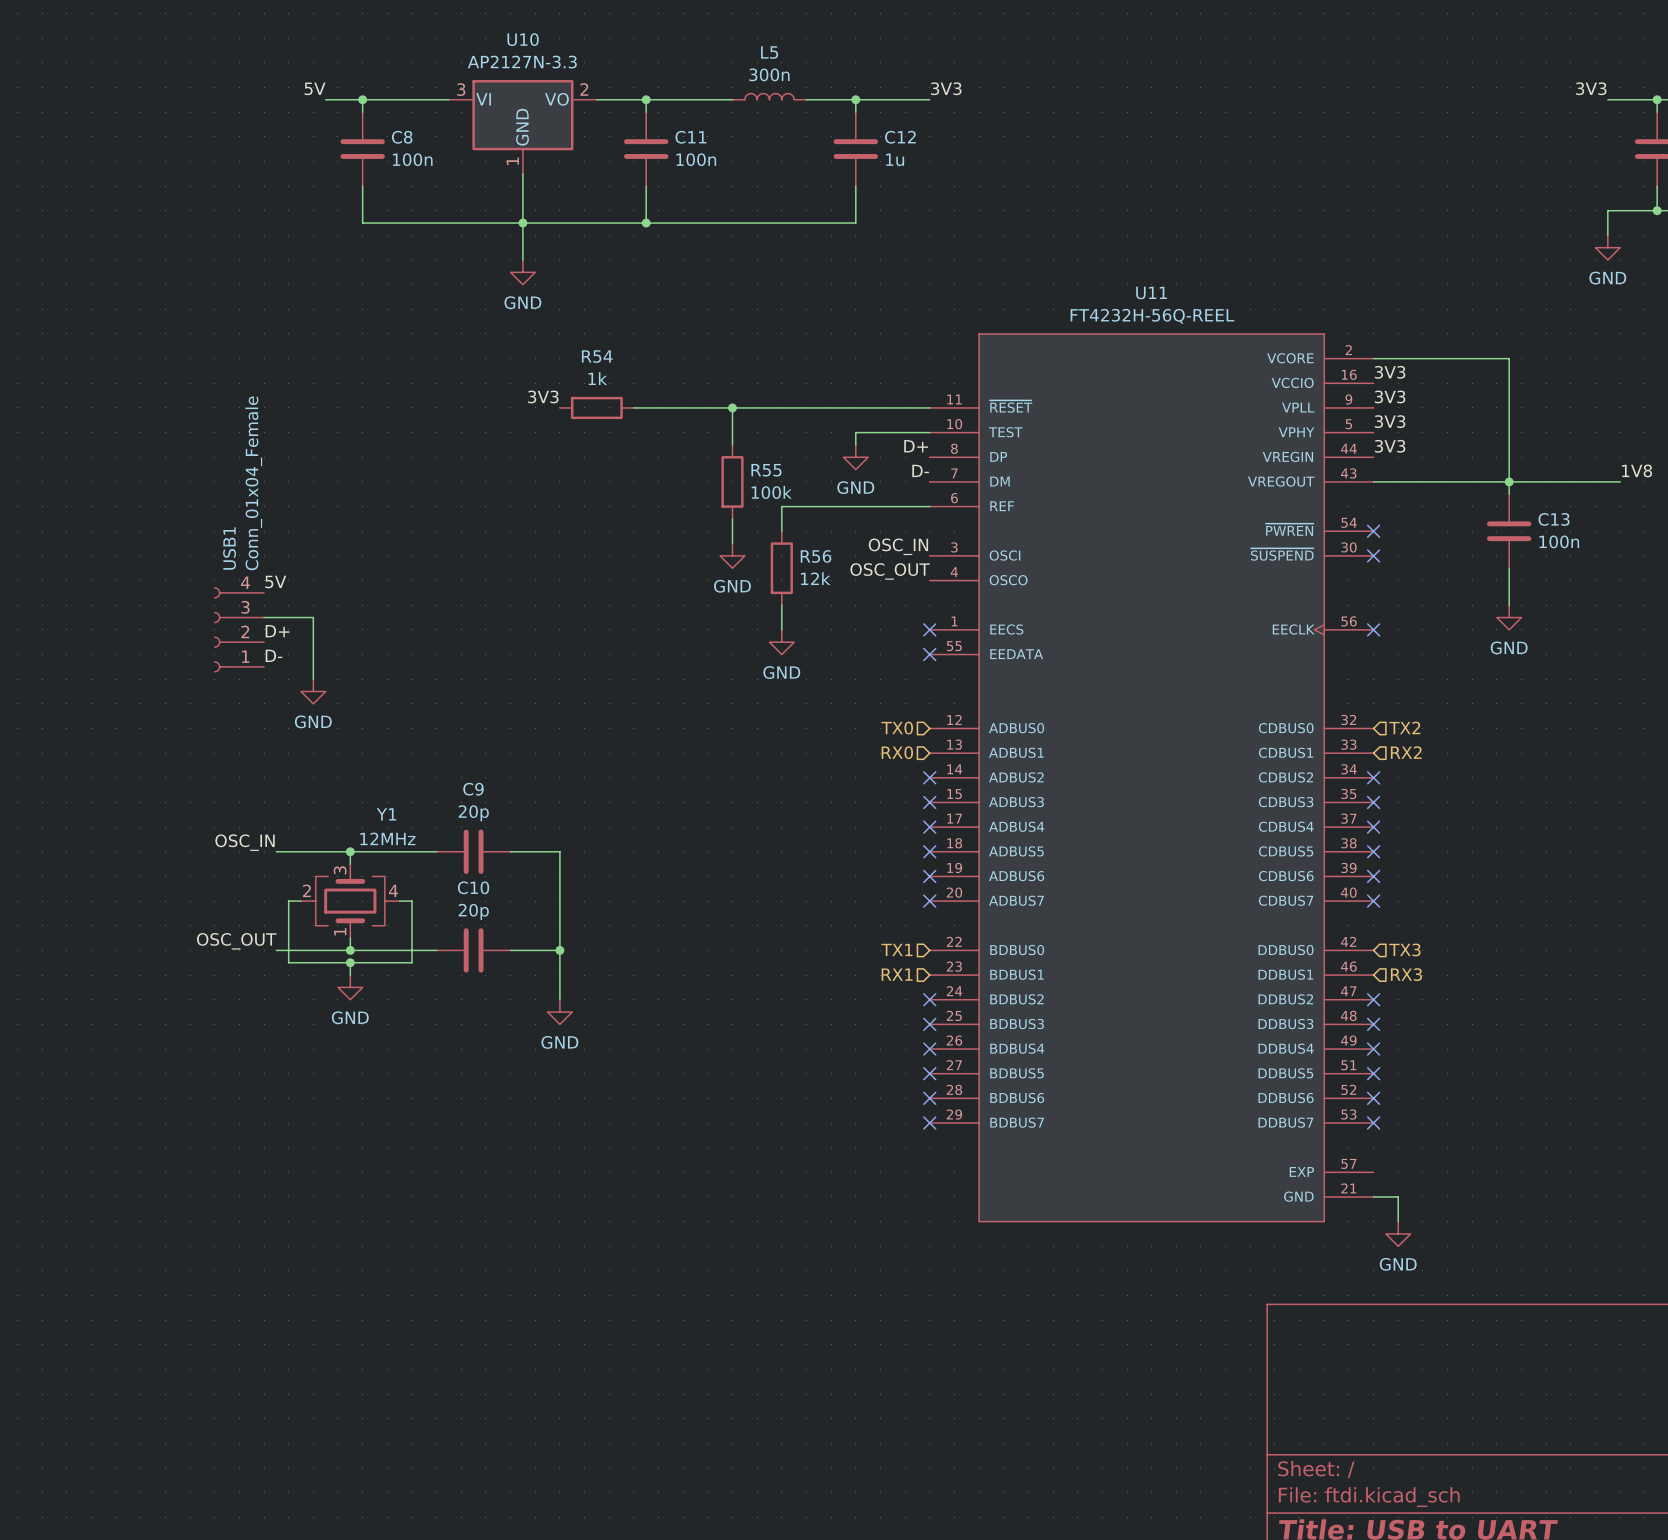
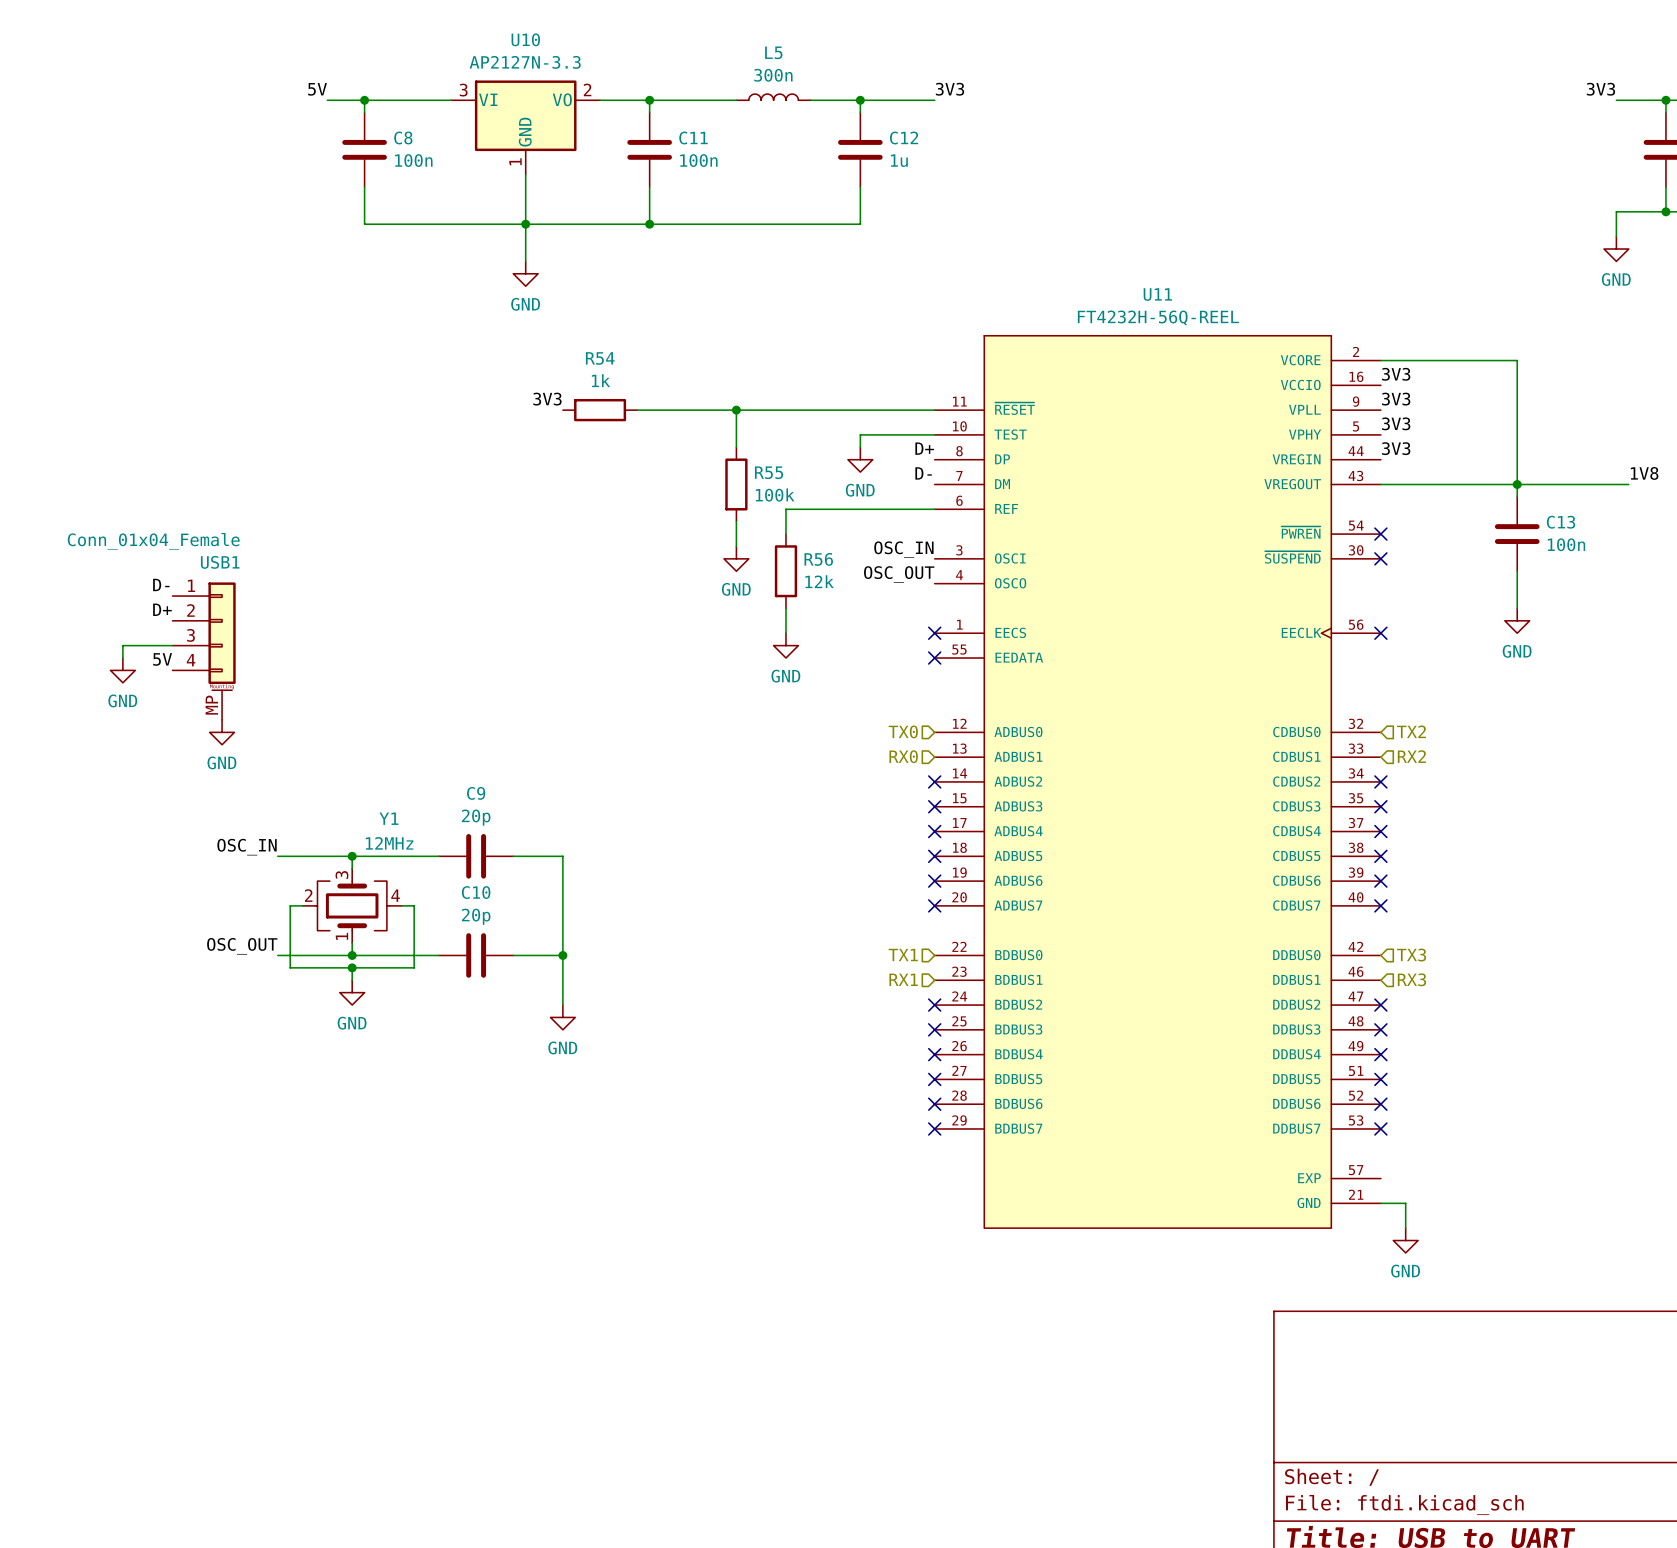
USB1 value position: Conn_01x04_Female (253, 483) -> Conn_01x04_Female (153, 541)
label position: 5V (275, 582) -> 5V (162, 659)
USB1 symbol: [213, 587, 265, 673] -> [172, 582, 236, 720]
wire: (264, 617) (313, 617) (313, 679) -> none
label position: D+ (277, 631) -> D+ (162, 609)
wire: none -> (172, 645) (122, 645) (122, 658)
label position: D- (274, 655) -> D- (161, 584)
power symbol: none -> GND (122, 670)
power symbol: GND (313, 691) -> none
power symbol: none -> GND (222, 732)

